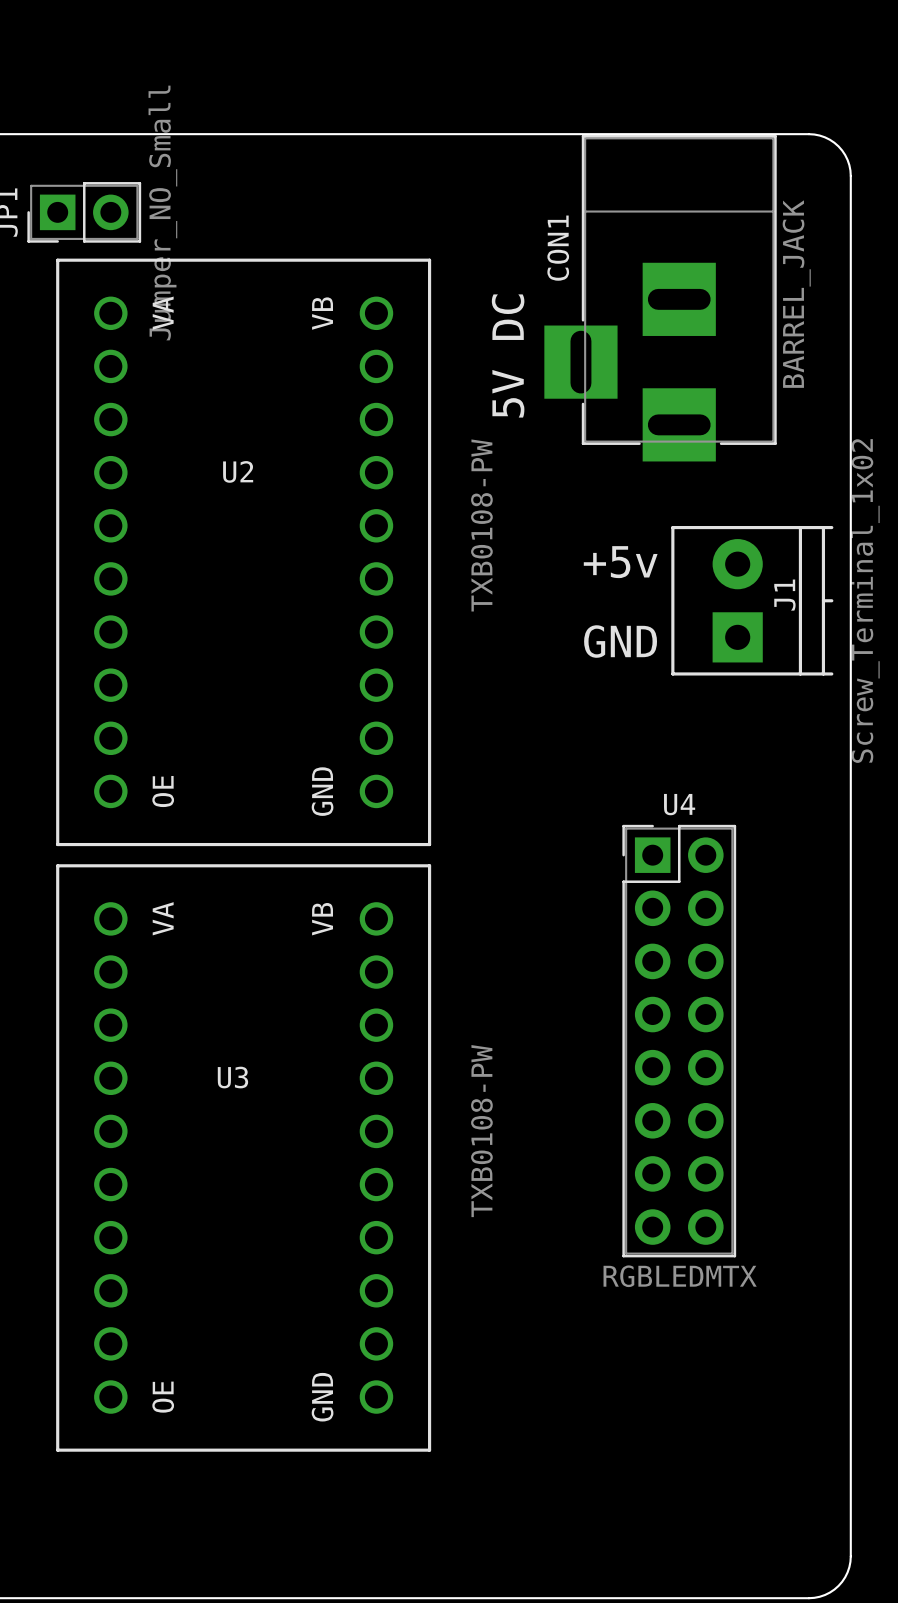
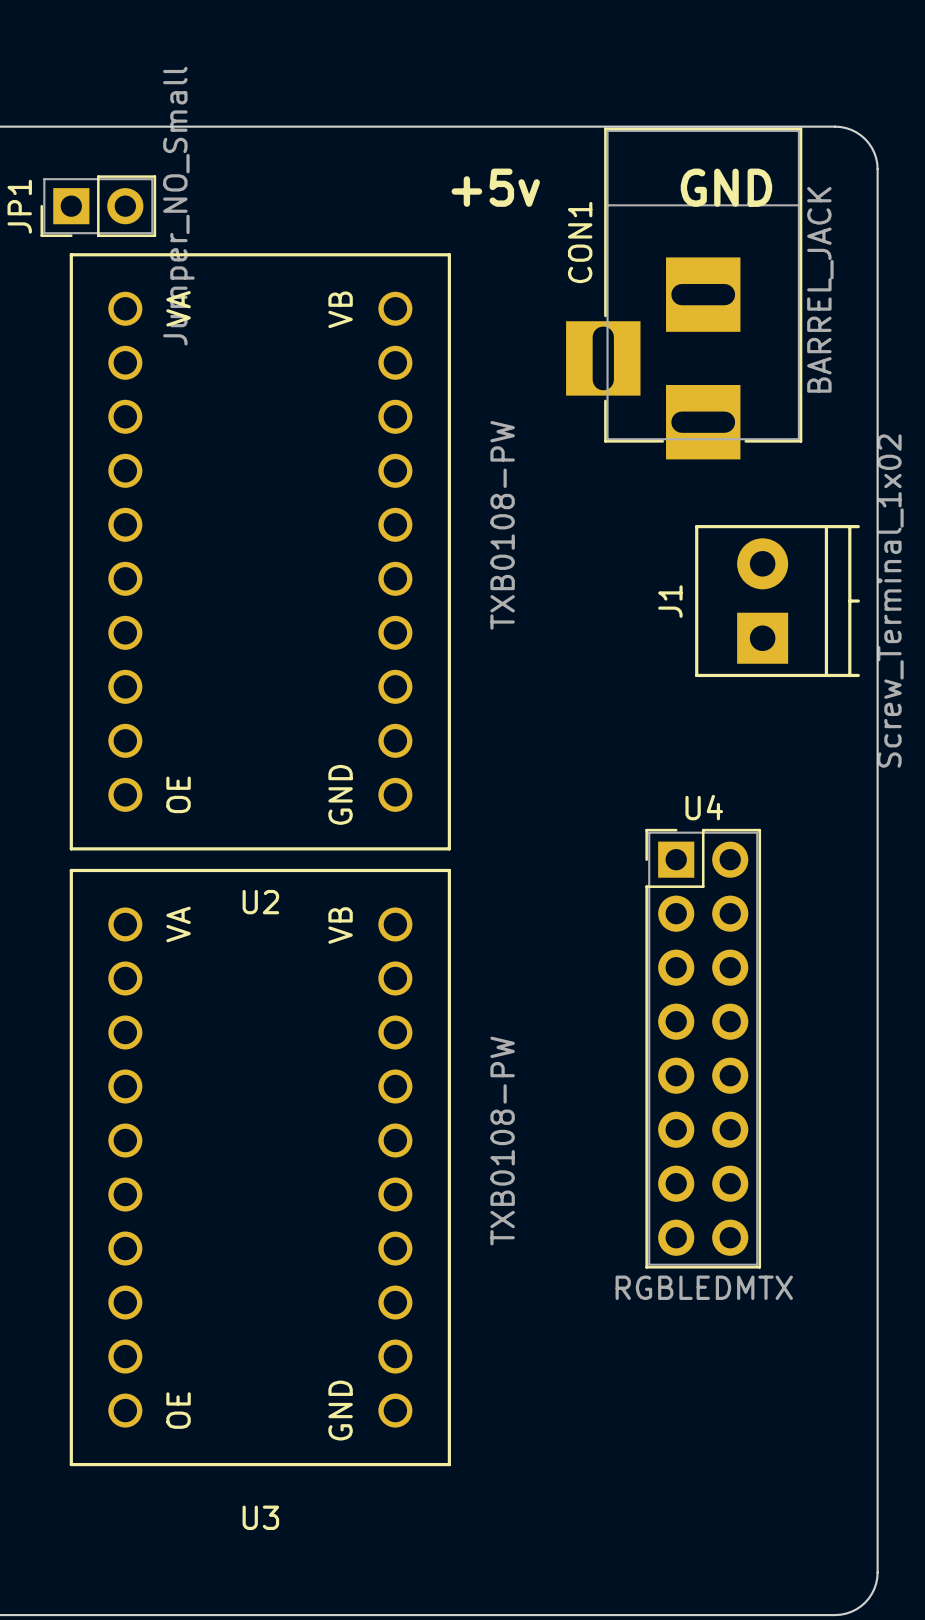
text: 5V DC (508, 355) -> none
U2 name position: U2 (238, 471) -> U2 (260, 902)
text position: +5v (620, 562) -> +5v (495, 187)
J1 name position: J1 (784, 595) -> J1 (670, 601)
text position: GND (620, 641) -> GND (726, 187)
U3 name position: U3 (232, 1077) -> U3 (260, 1517)

